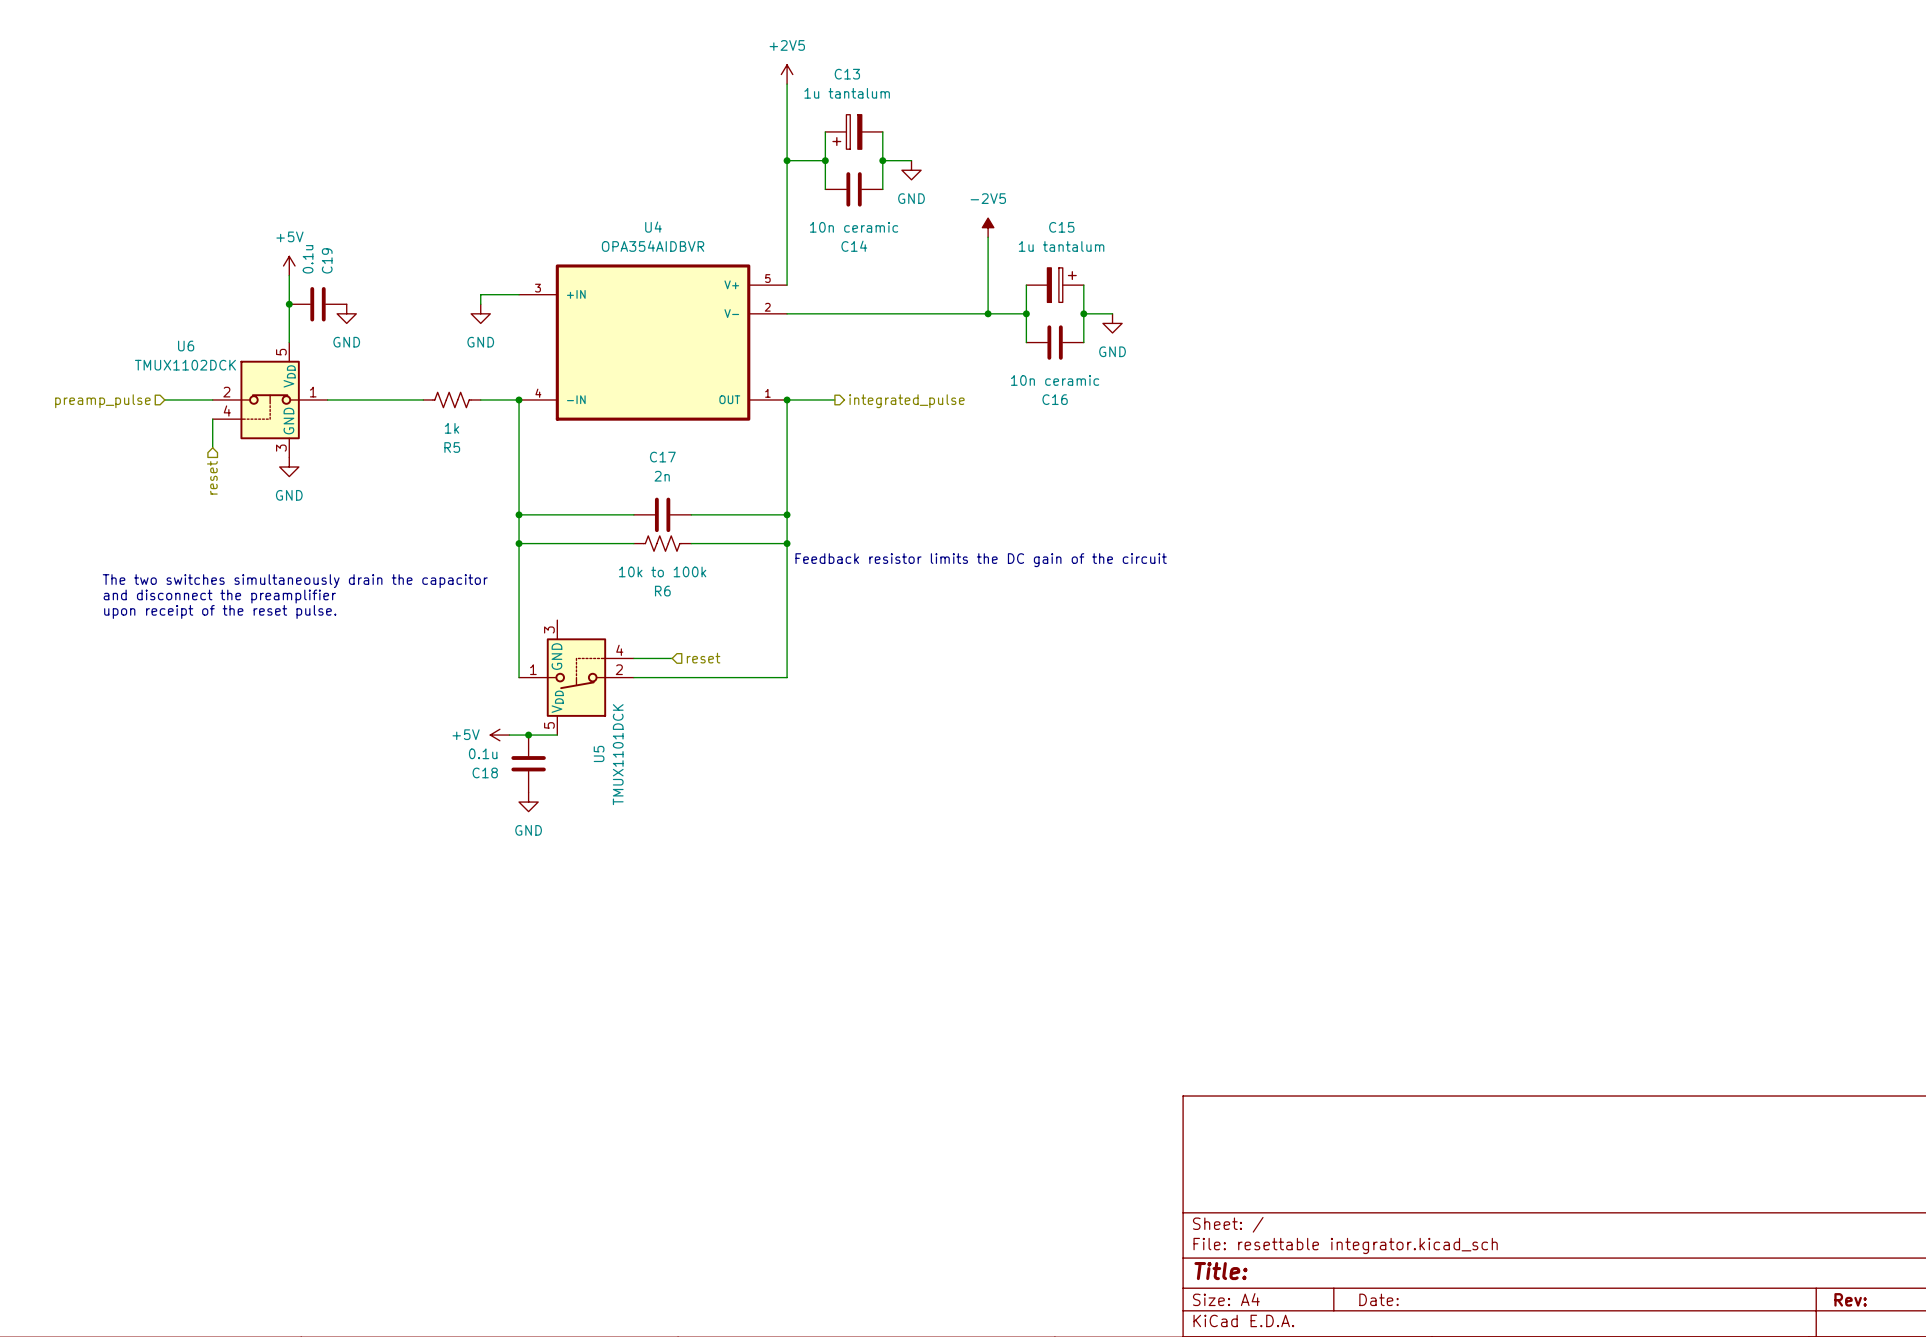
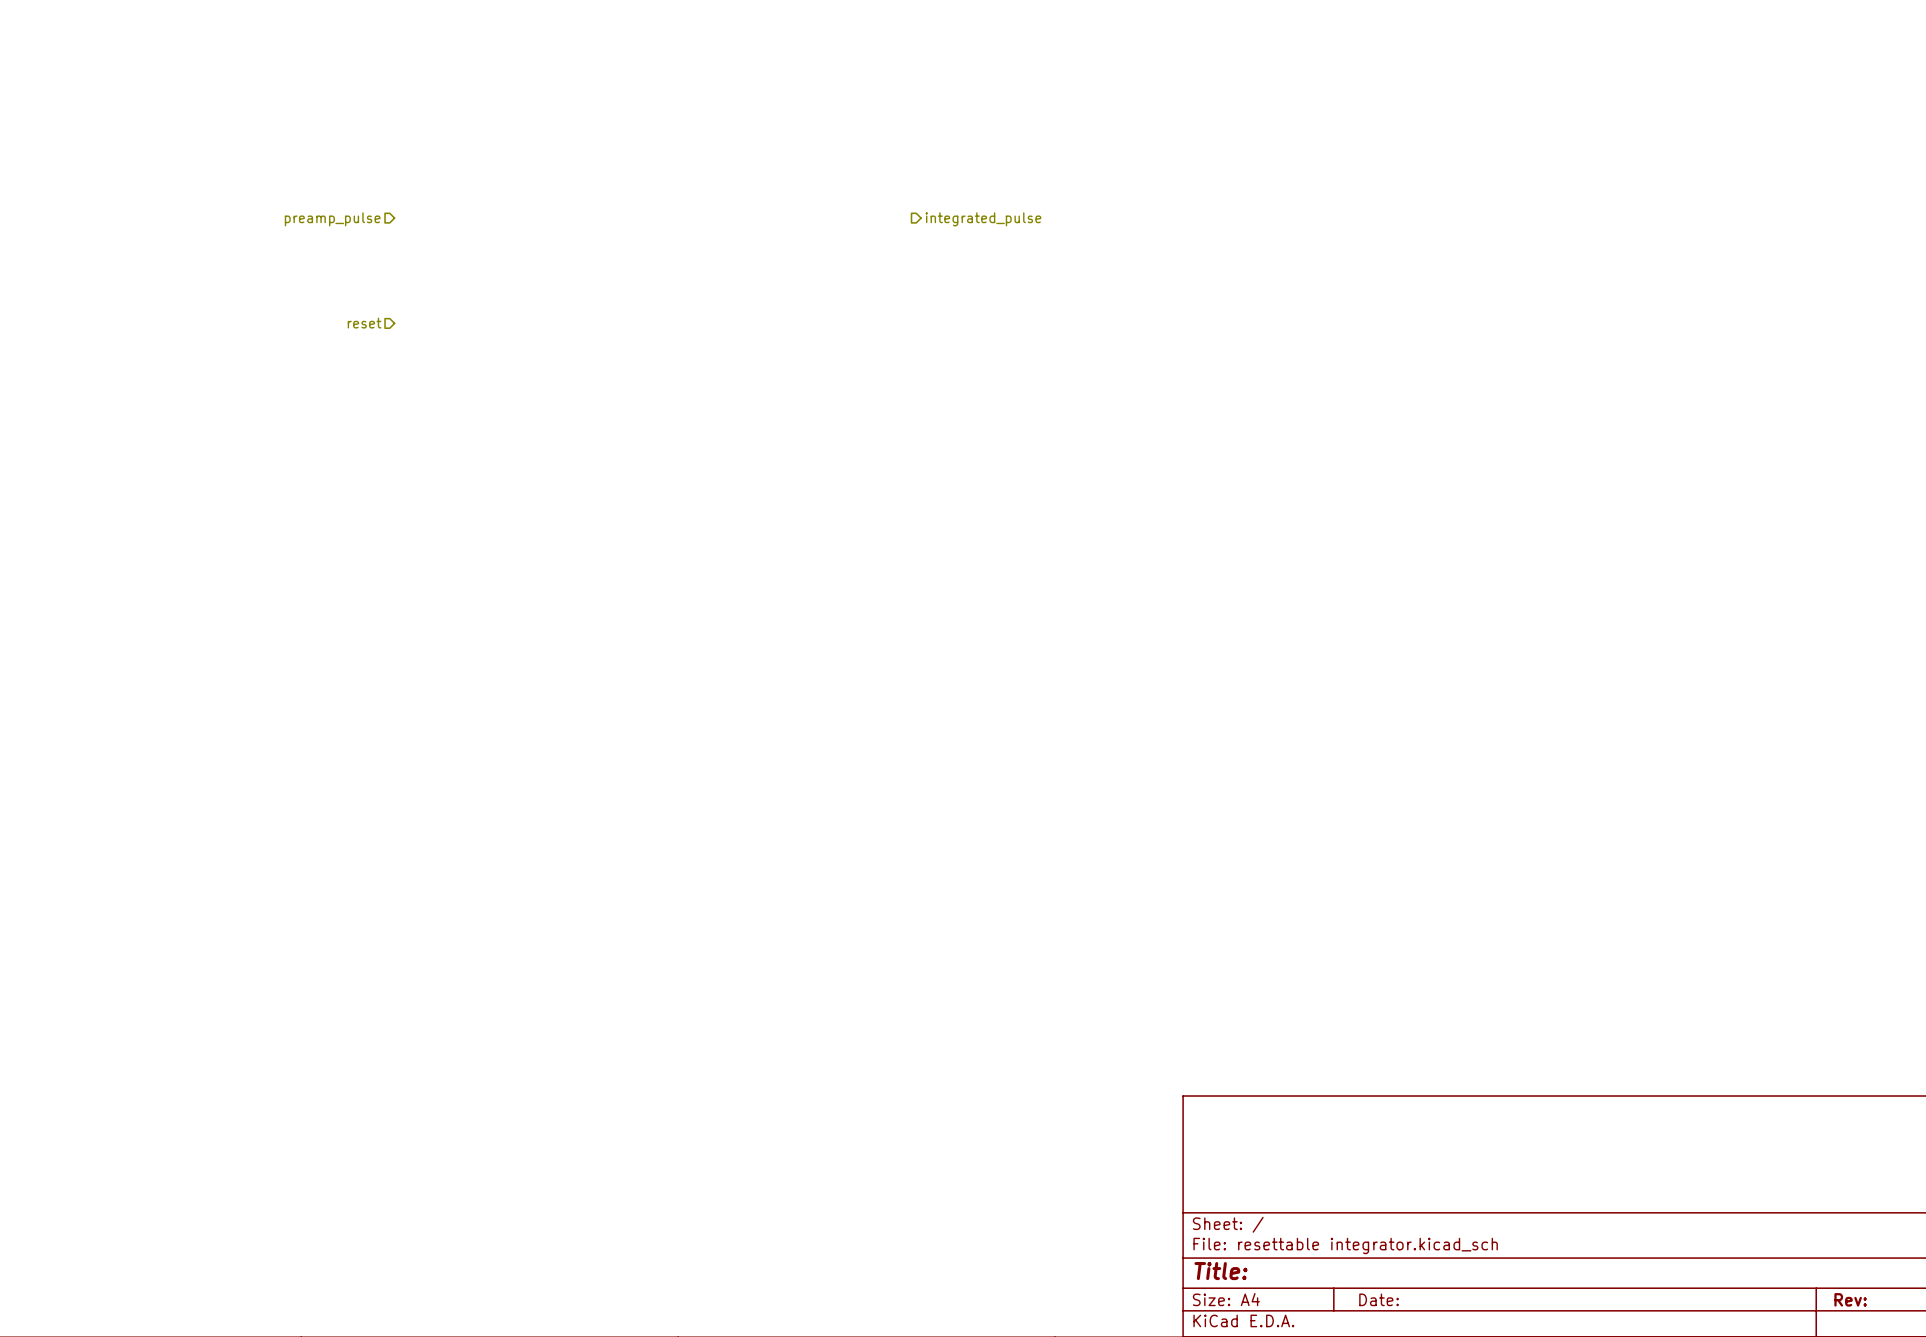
power symbol: +2V5 (787, 74) -> none
wire: (787, 84) (787, 285) -> none
wire: (825, 131) (825, 189) -> none
C13: 1u tantalum (854, 131) -> none
wire: (882, 131) (882, 189) -> none
wire: (787, 160) (825, 160) -> none
junction: (787, 160) -> none
junction: (825, 160) -> none
wire: (882, 160) (911, 160) -> none
junction: (882, 160) -> none
power symbol: GND (911, 170) -> none
C14: 10n ceramic (854, 189) -> none
hierarchical label: none -> preamp_pulse (332, 219)
hierarchical label: none -> integrated_pulse (983, 219)
power symbol: -2V5 (988, 227) -> none
wire: (988, 237) (988, 313) -> none
power symbol: +5V (289, 265) -> none
wire: (289, 275) (289, 342) -> none
wire: (1026, 285) (1026, 342) -> none
C15: 1u tantalum (1055, 285) -> none
wire: (1083, 285) (1083, 342) -> none
wire: (519, 294) (480, 294) (480, 304) -> none
junction: (289, 304) -> none
C19: 0.1u (318, 304) -> none
power symbol: GND (346, 313) -> none
power symbol: GND (480, 313) -> none
wire: (787, 313) (1026, 313) -> none
junction: (988, 313) -> none
junction: (1026, 313) -> none
wire: (1083, 313) (1112, 313) -> none
junction: (1083, 313) -> none
hierarchical label: none -> reset (364, 323)
power symbol: GND (1112, 323) -> none
U4: OPA354AIDBVR (653, 342) -> none
C16: 10n ceramic (1055, 342) -> none
wire: (164, 399) (212, 399) -> none
U6: TMUX1102DCK (270, 399) -> none
wire: (327, 399) (423, 399) -> none
R5: 1k (452, 399) -> none
wire: (480, 399) (519, 399) (519, 677) -> none
junction: (519, 399) -> none
junction: (787, 399) -> none
wire: (834, 399) (787, 399) (787, 677) (633, 677) -> none
hierarchical label: preamp_pulse (102, 401) -> none
hierarchical label: integrated_pulse (906, 401) -> none
wire: (212, 419) (212, 447) -> none
power symbol: GND (289, 467) -> none
hierarchical label: reset (212, 477) -> none
wire: (519, 514) (633, 514) -> none
junction: (519, 514) -> none
C17: 2n (662, 514) -> none
wire: (691, 514) (787, 514) -> none
junction: (787, 514) -> none
wire: (519, 543) (633, 543) -> none
junction: (519, 543) -> none
R6: 10k to 100k (662, 543) -> none
wire: (691, 543) (787, 543) -> none
junction: (787, 543) -> none
text: Feedback resistor limits the DC gain of the circuit (981, 560) -> none
text: The two switches simultaneously drain the capacitor (295, 581) -> none
text: and disconnect the preamplifier (219, 596) -> none
text: upon receipt of the reset pulse. (220, 611) -> none
wire: (633, 658) (672, 658) -> none
hierarchical label: reset (703, 658) -> none
U5: TMUX1101DCK (576, 677) -> none
power symbol: +5V (499, 735) -> none
wire: (509, 735) (557, 735) -> none
junction: (528, 735) -> none
C18: 0.1u (528, 763) -> none
power symbol: GND (528, 802) -> none

